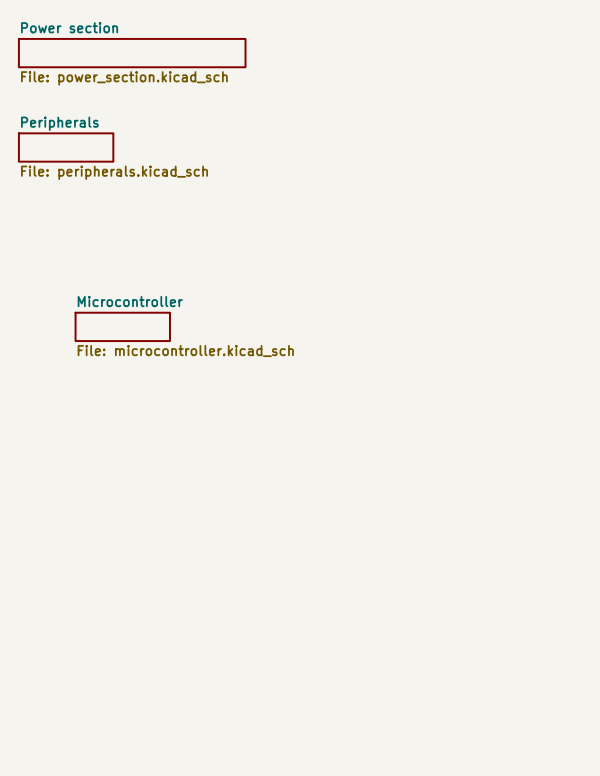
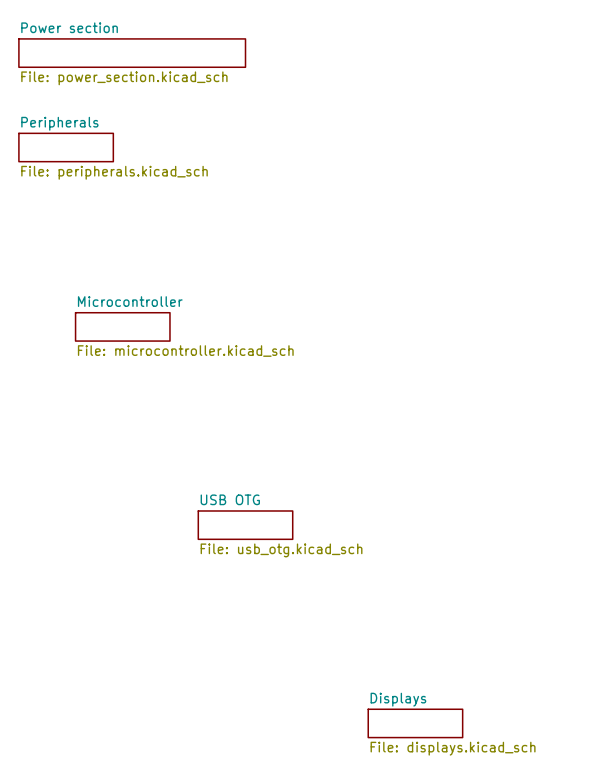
sheet USB OTG: none -> File: usb_otg.kicad_sch (245, 525)
sheet Displays: none -> File: displays.kicad_sch (415, 723)

